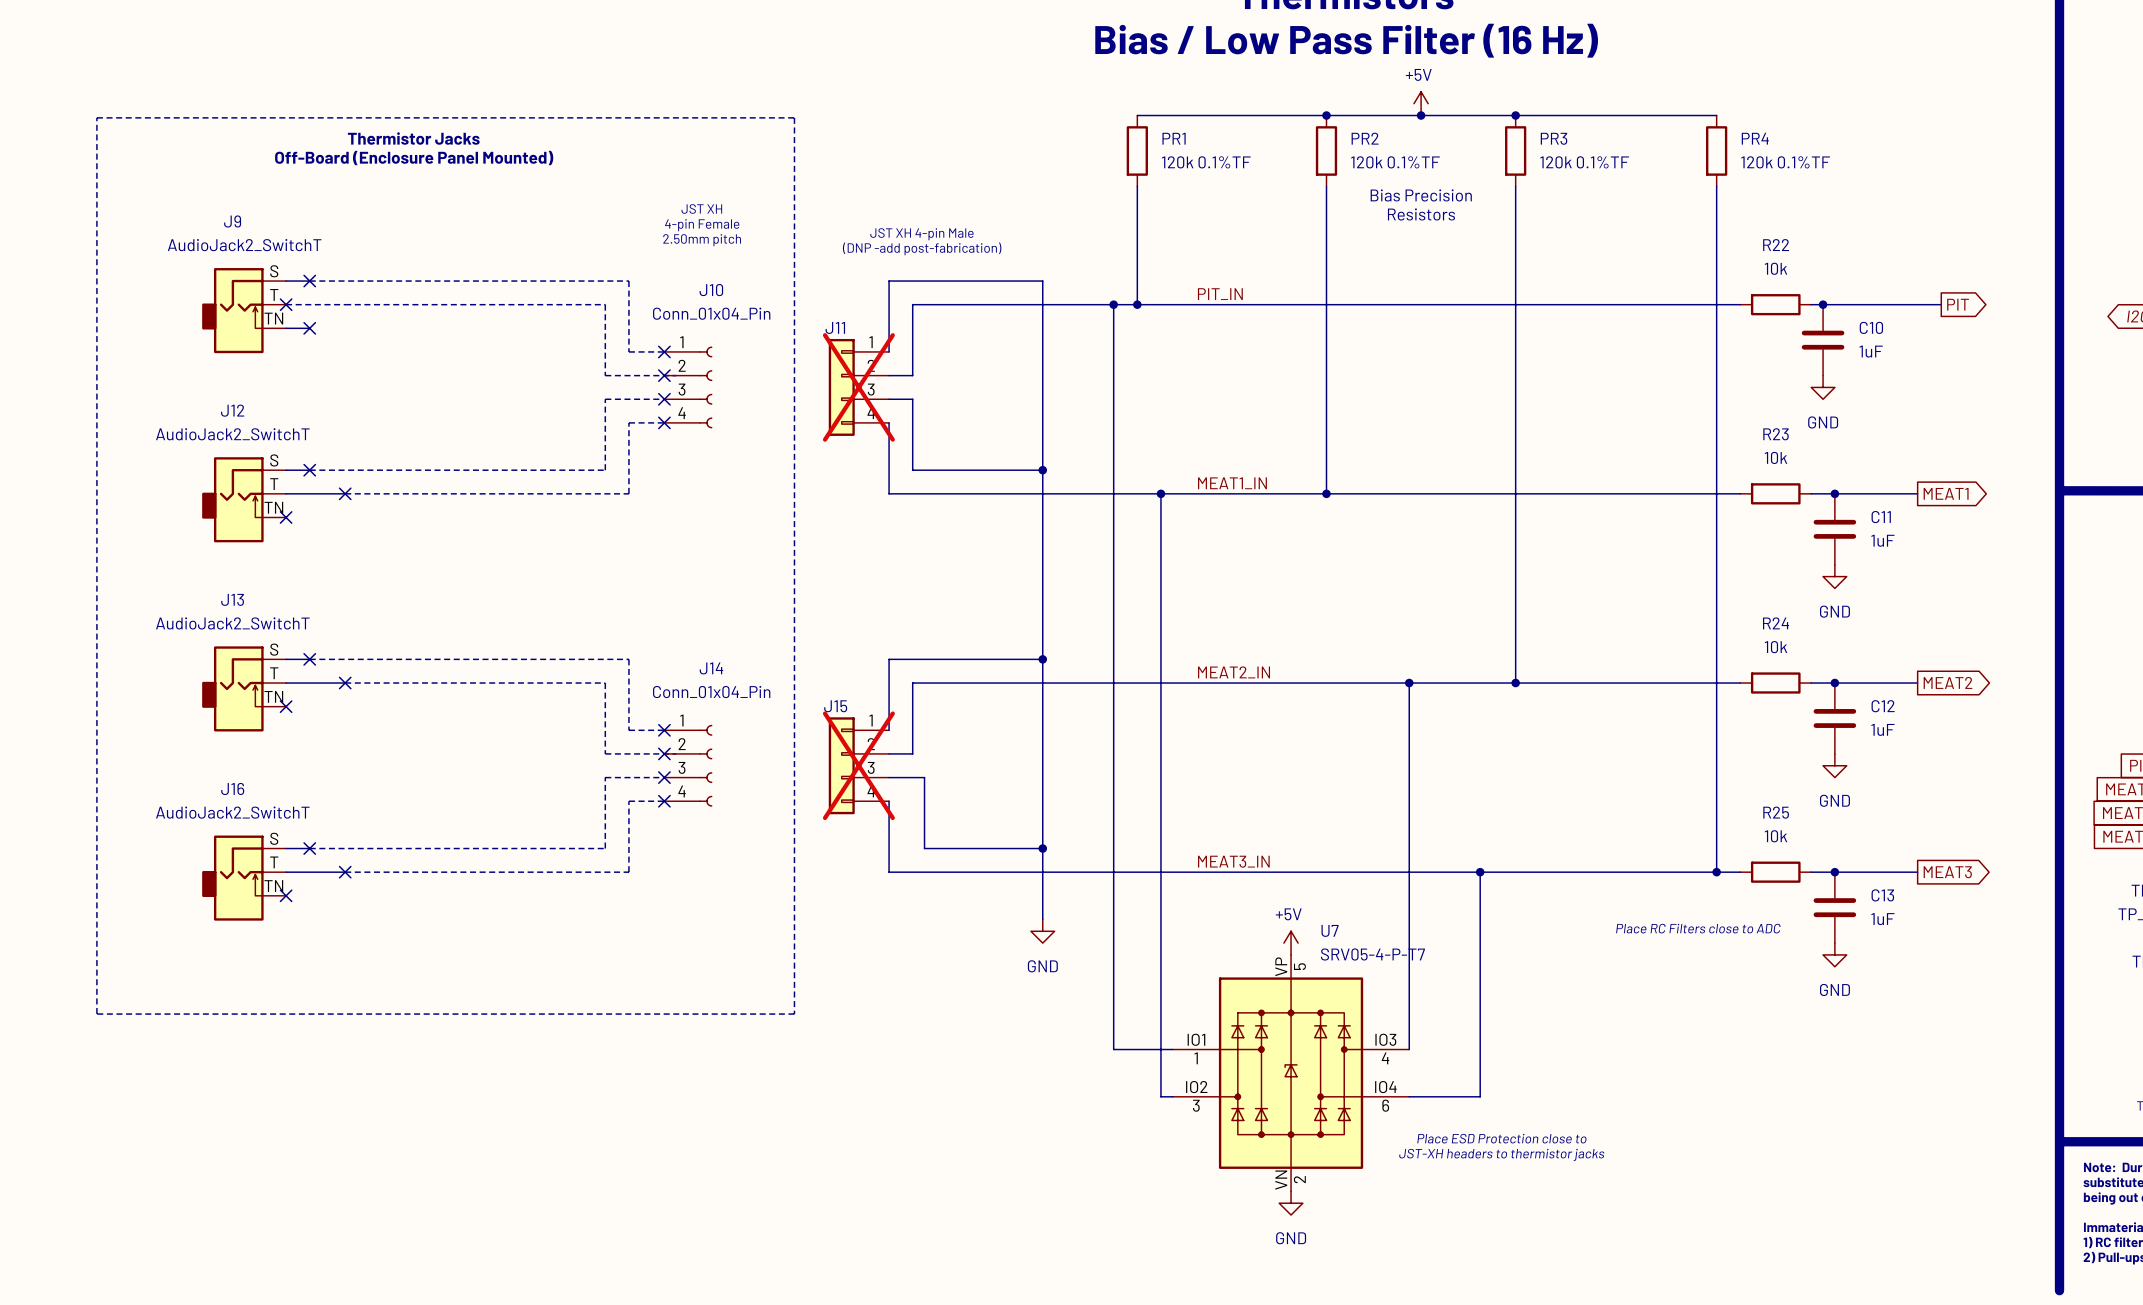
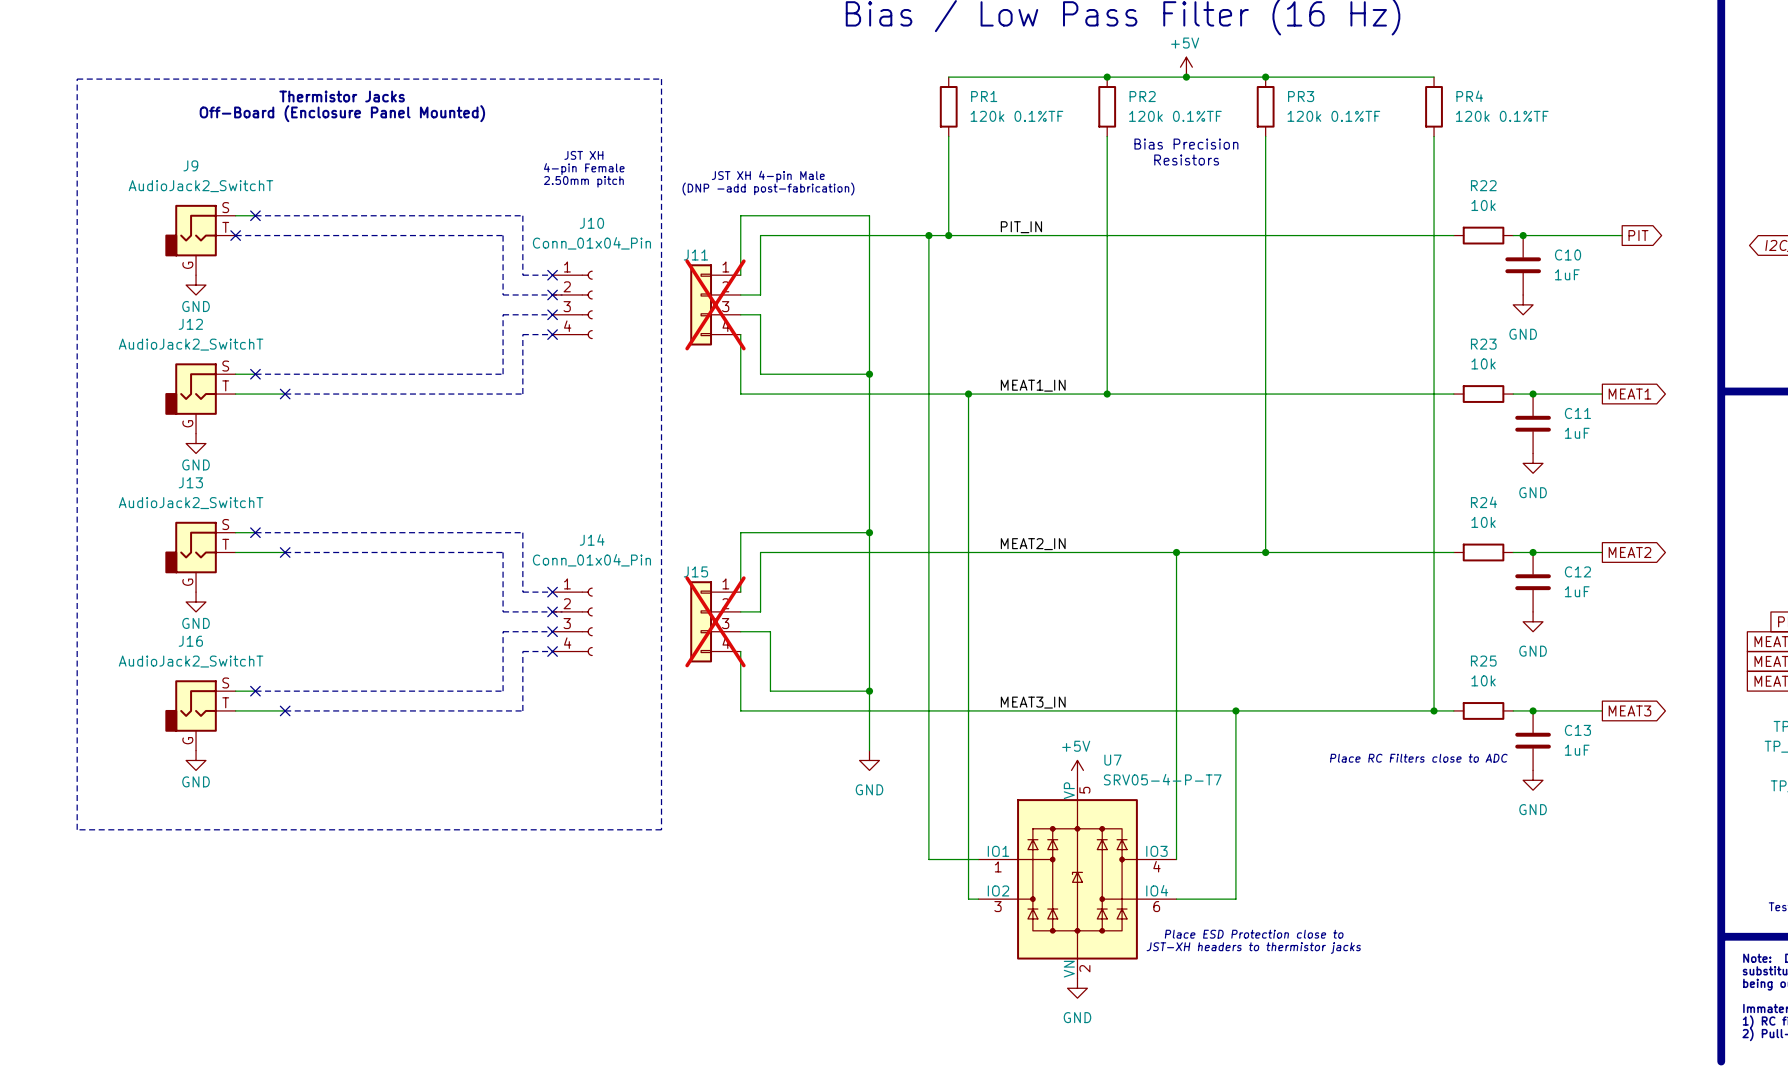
J9 symbol: [202, 268, 287, 354] -> [165, 204, 236, 276]
wire: (286, 328) (309, 328) -> none
no-connect mark: (309, 328) -> none
power symbol: none -> GND (196, 285)
J12 symbol: [202, 457, 287, 543] -> [165, 363, 236, 434]
no-connect mark: (286, 517) -> none
power symbol: none -> GND (196, 443)
J13 symbol: [202, 646, 287, 732] -> [165, 521, 236, 593]
no-connect mark: (286, 706) -> none
power symbol: none -> GND (196, 602)
J16 symbol: [202, 835, 287, 921] -> [165, 680, 236, 751]
no-connect mark: (286, 895) -> none
power symbol: none -> GND (196, 760)

